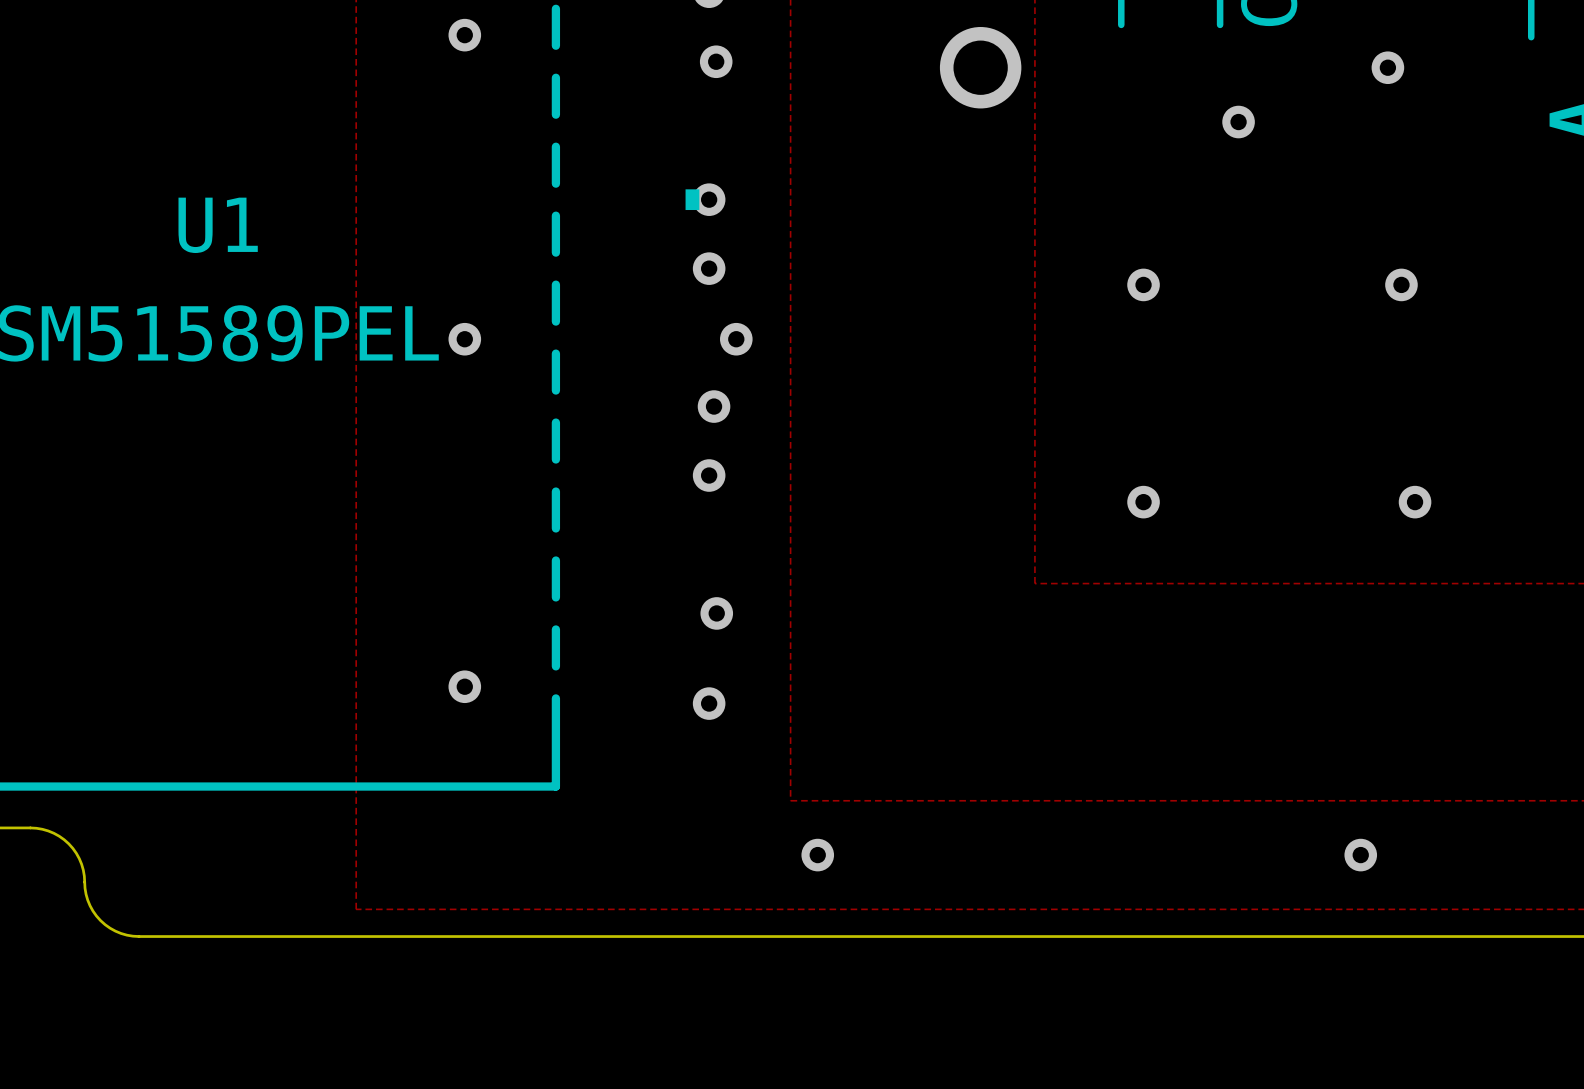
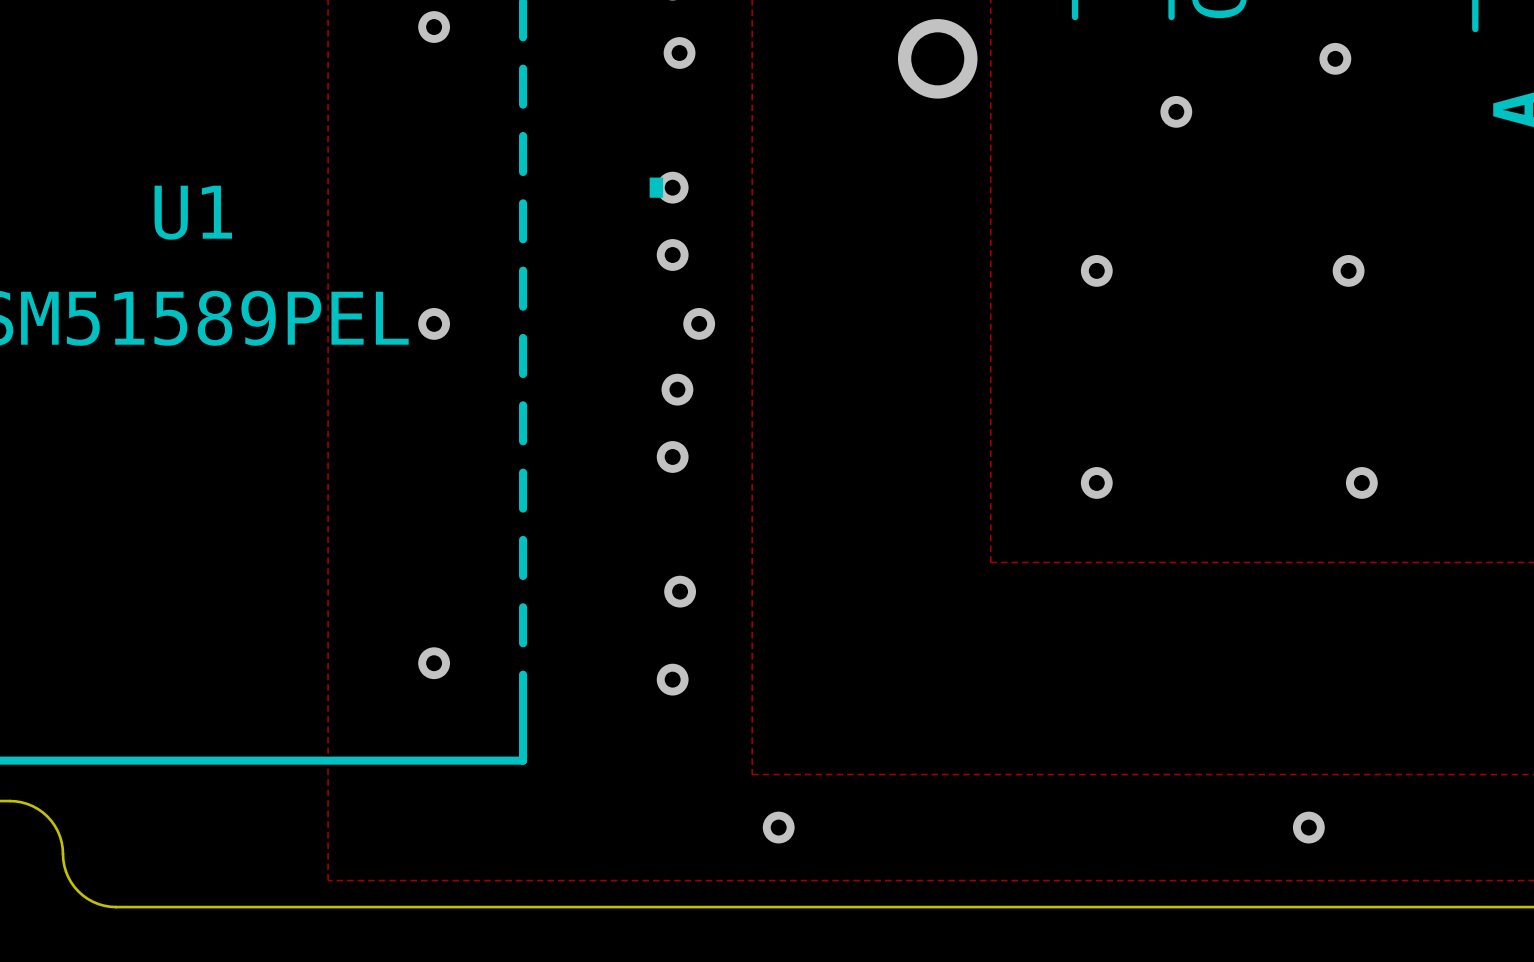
via position: (1238, 122) -> (1176, 111)

